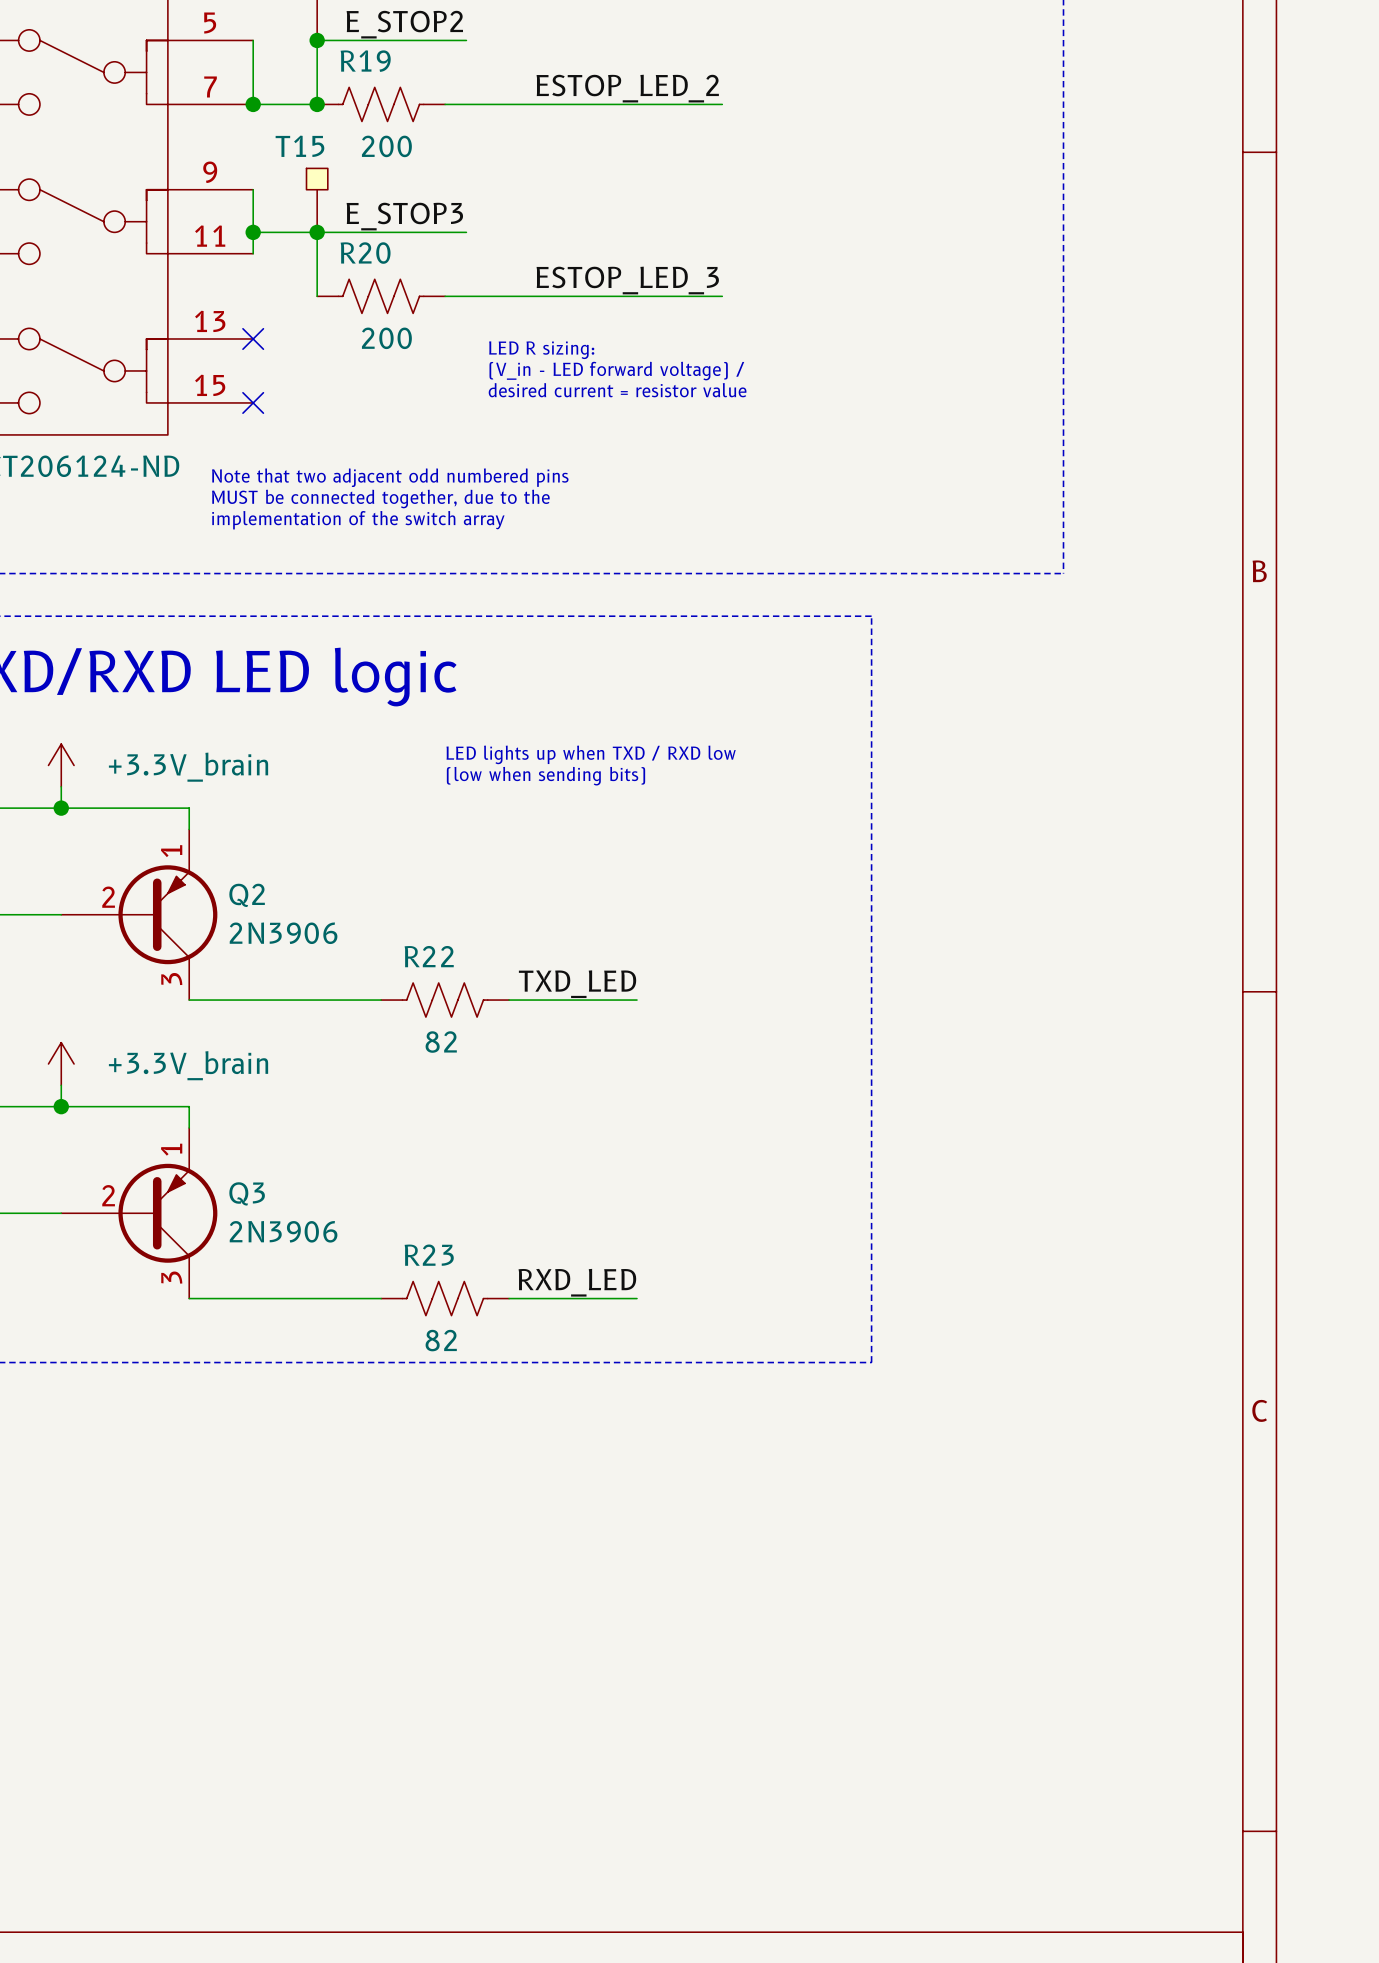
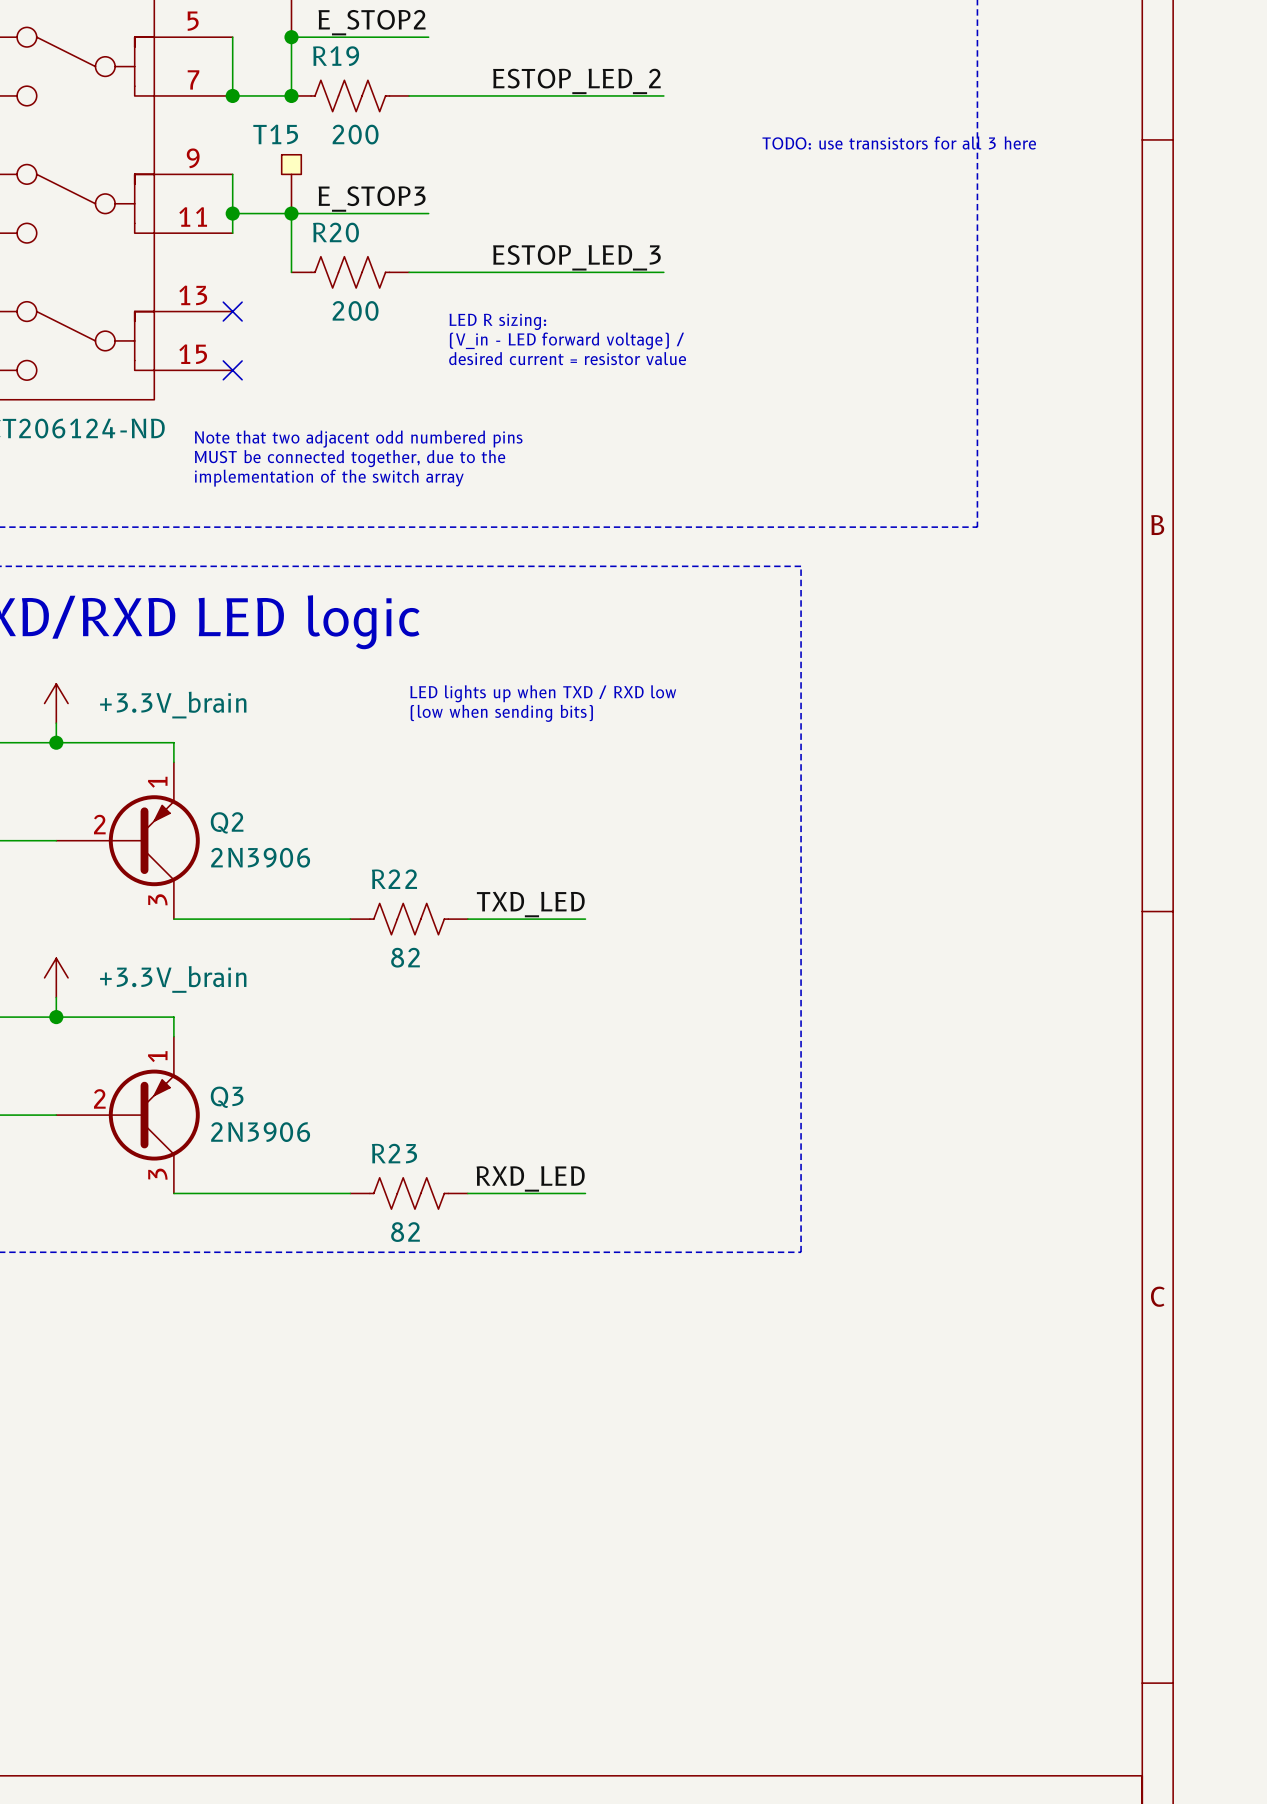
text: none -> TODO: use transistors for all 3 here (899, 143)

